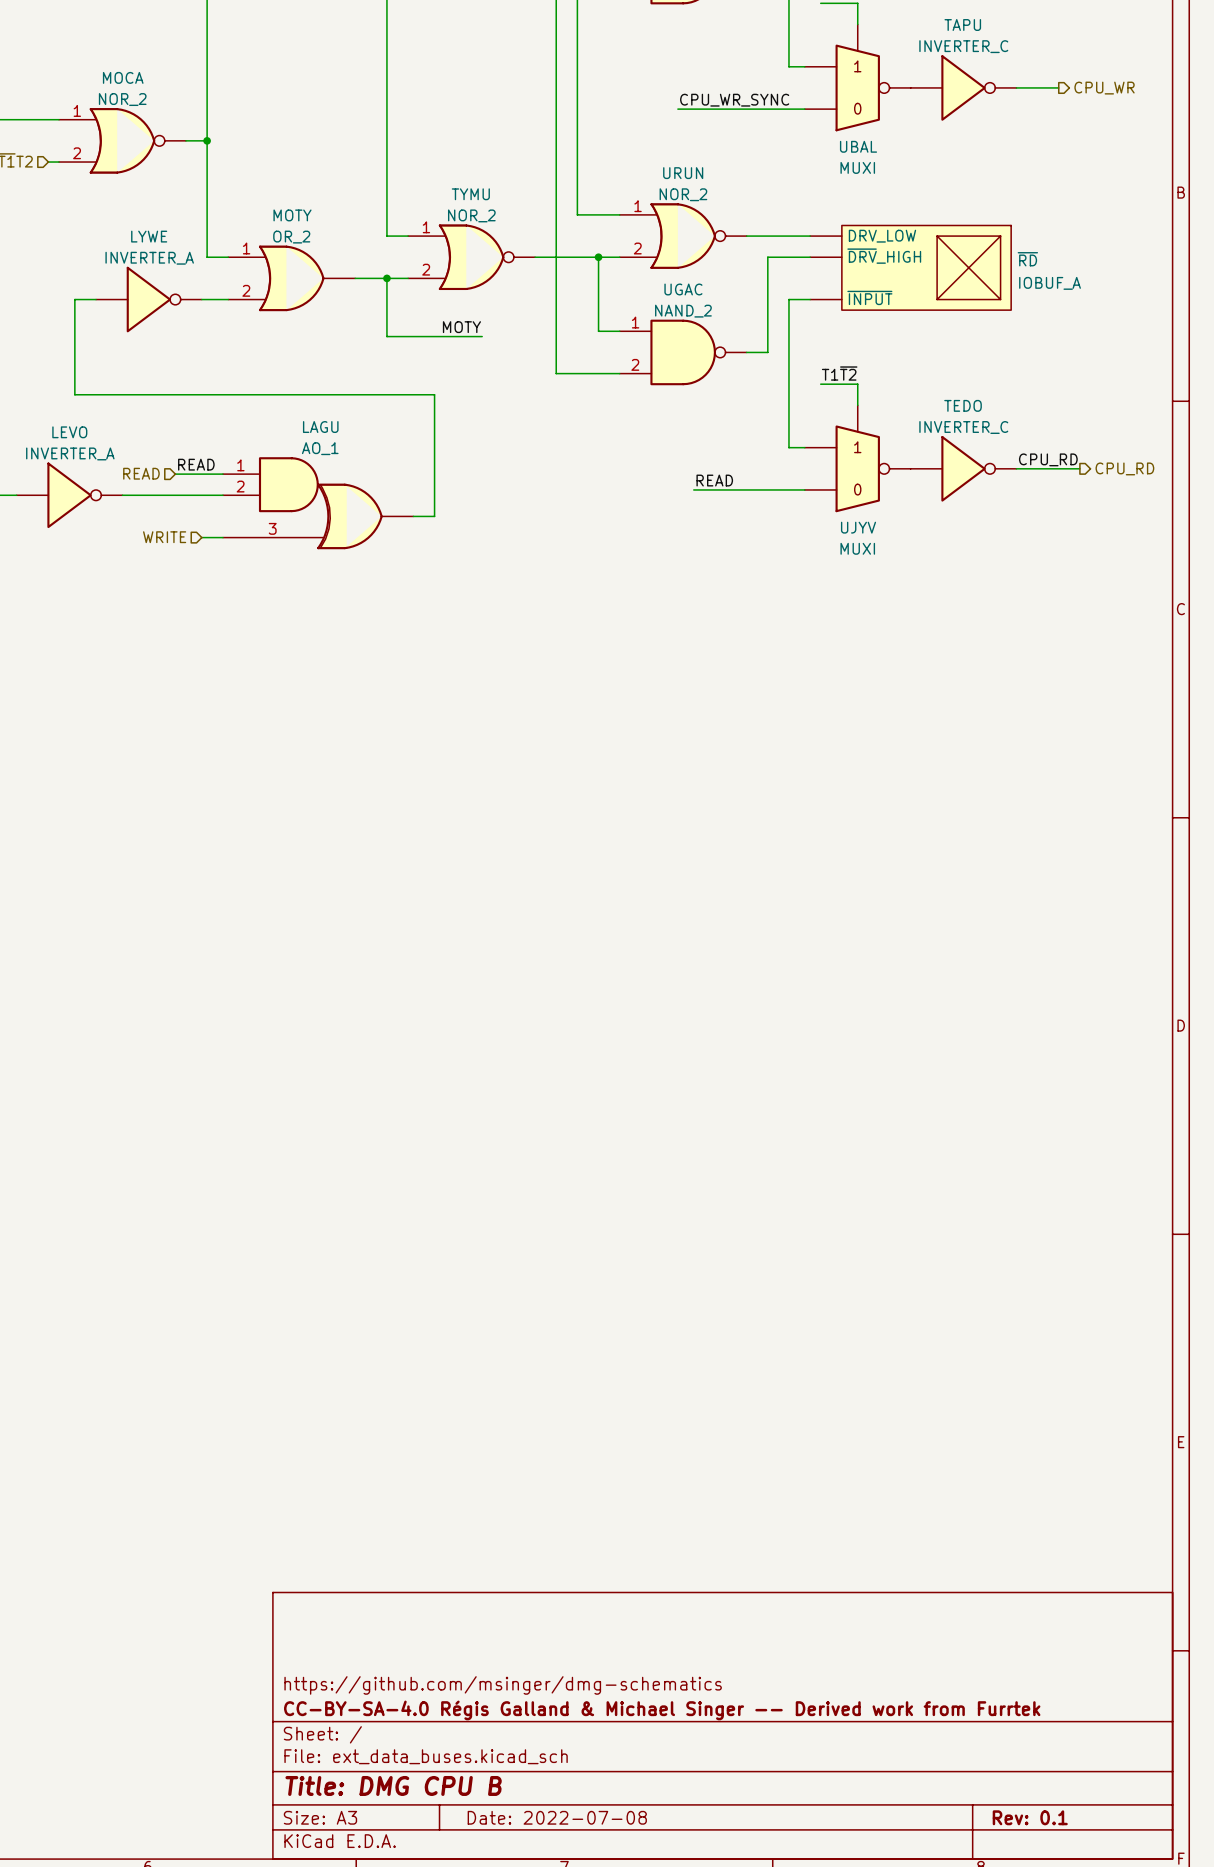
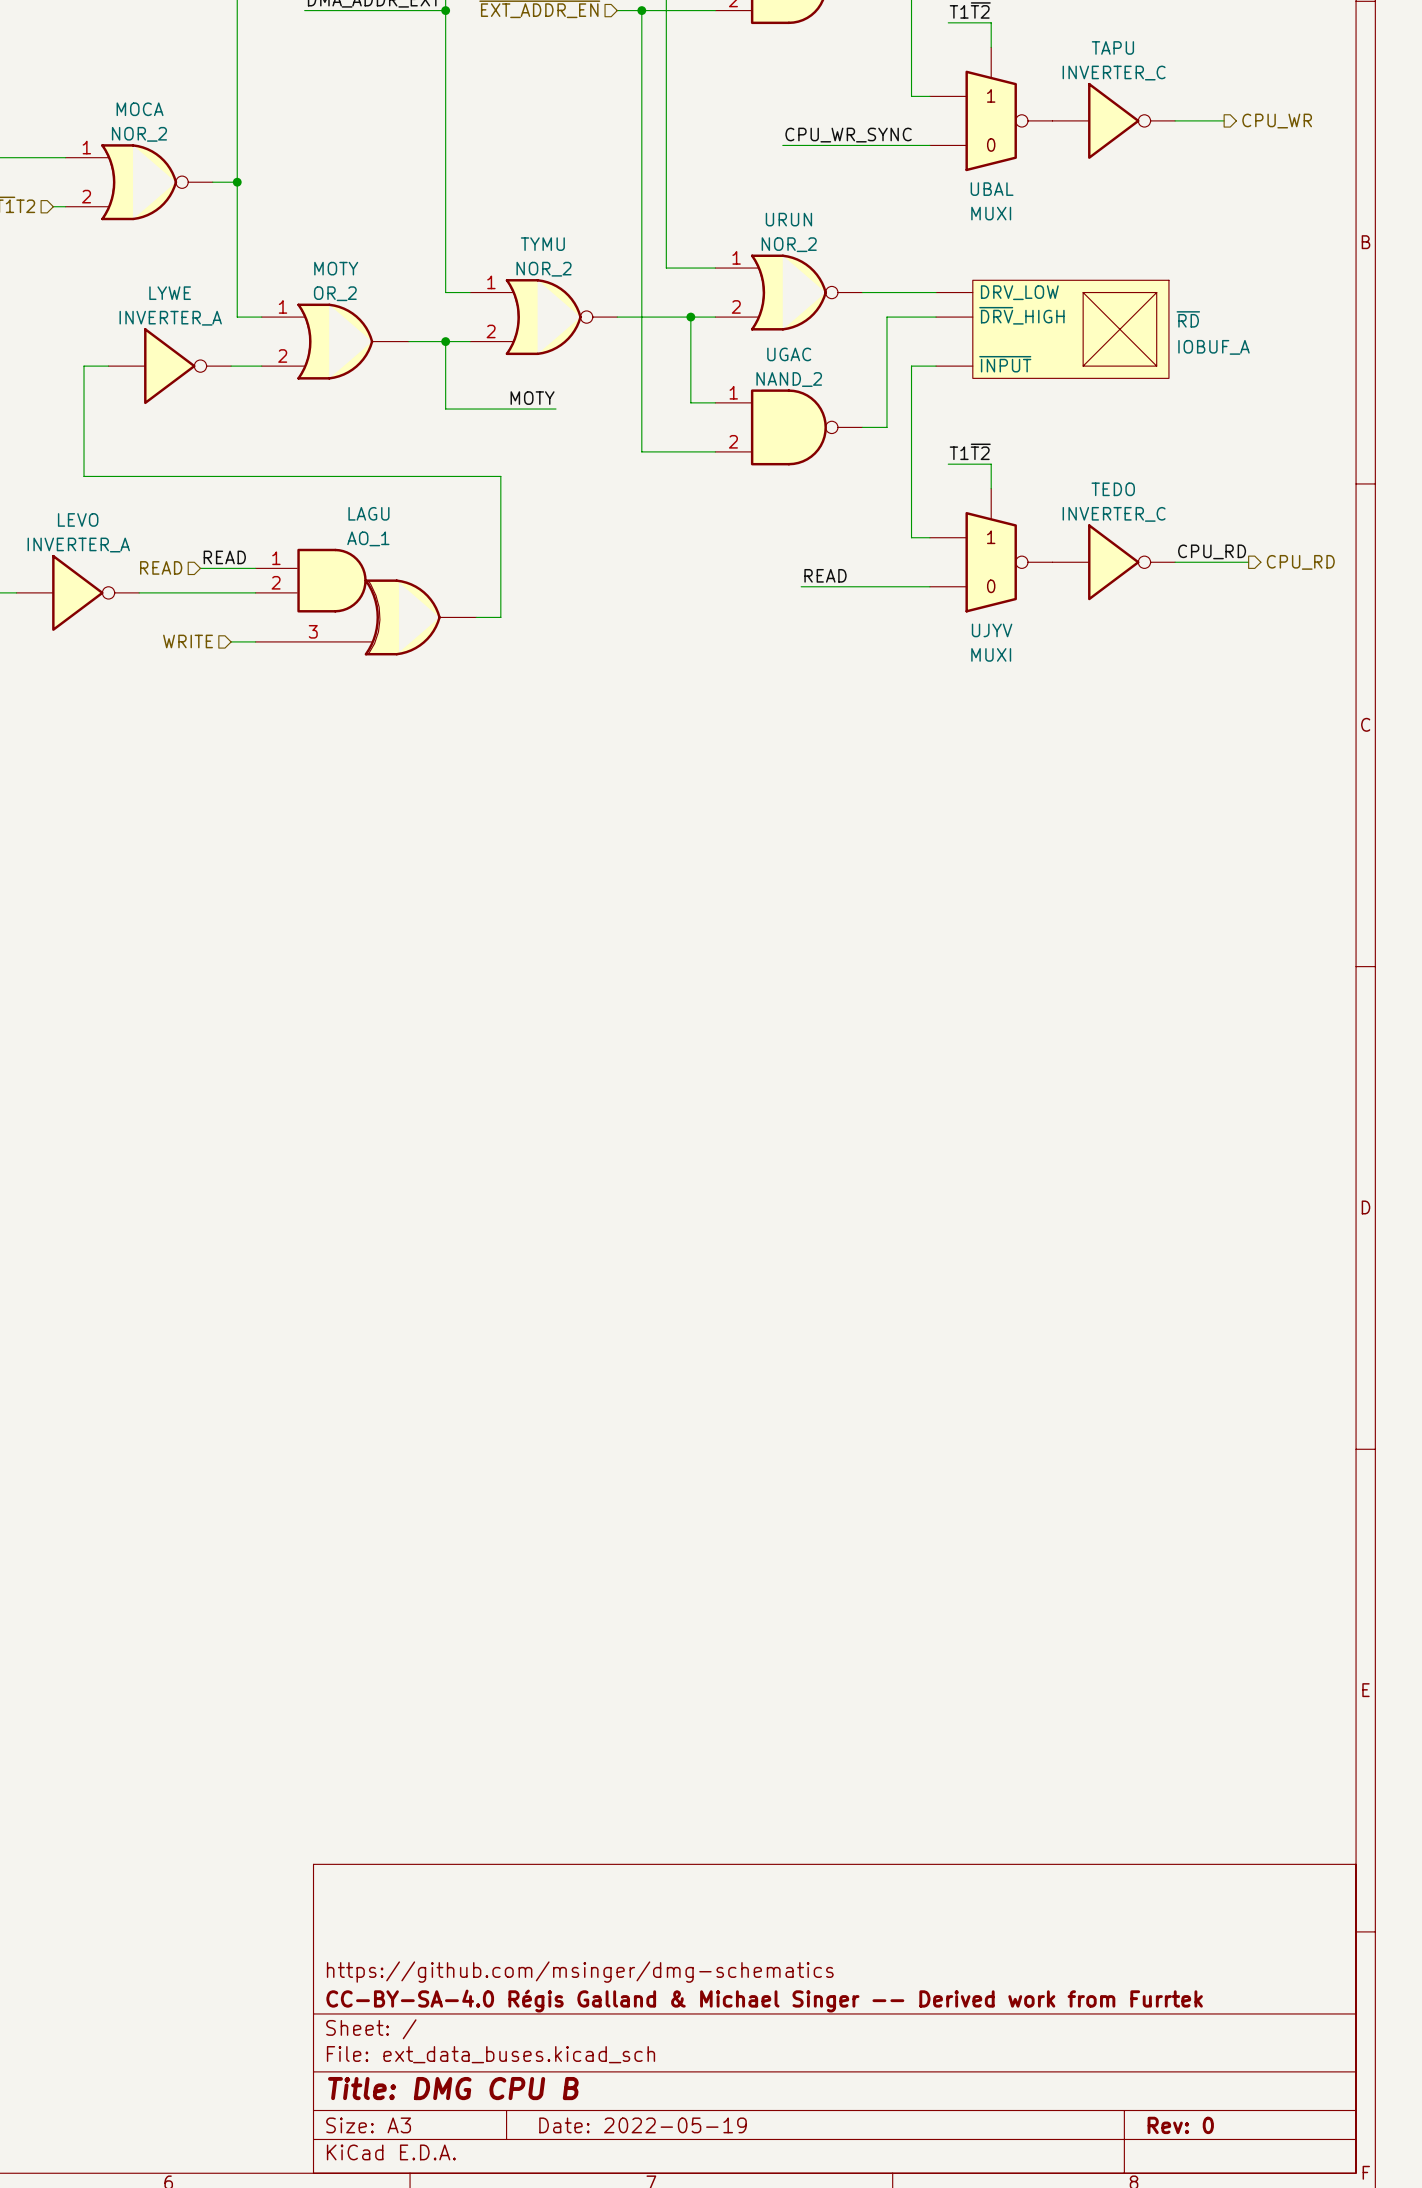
title block: Date: 2022-07-08 (557, 1817) -> Date: 2022-05-19 (643, 2125)
title block: Rev: 0.1 (1030, 1817) -> Rev: 0 (1180, 2125)

